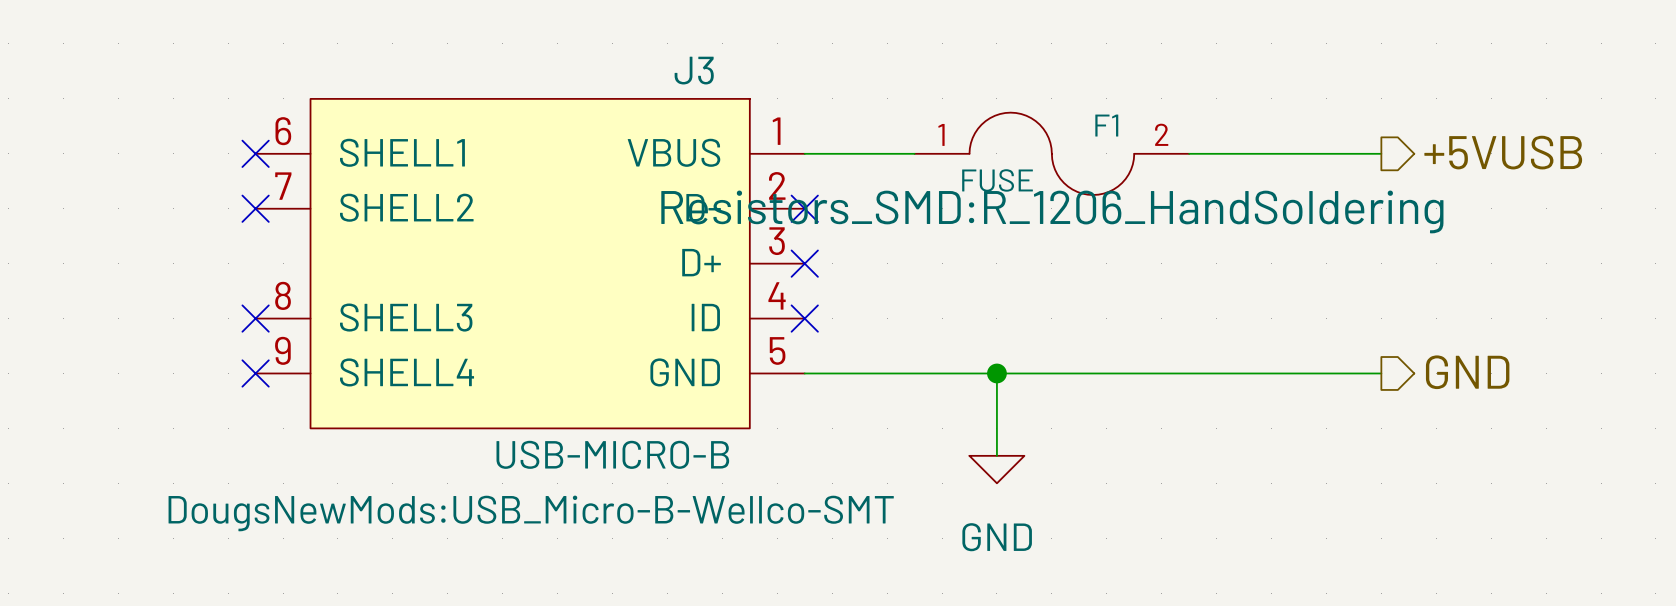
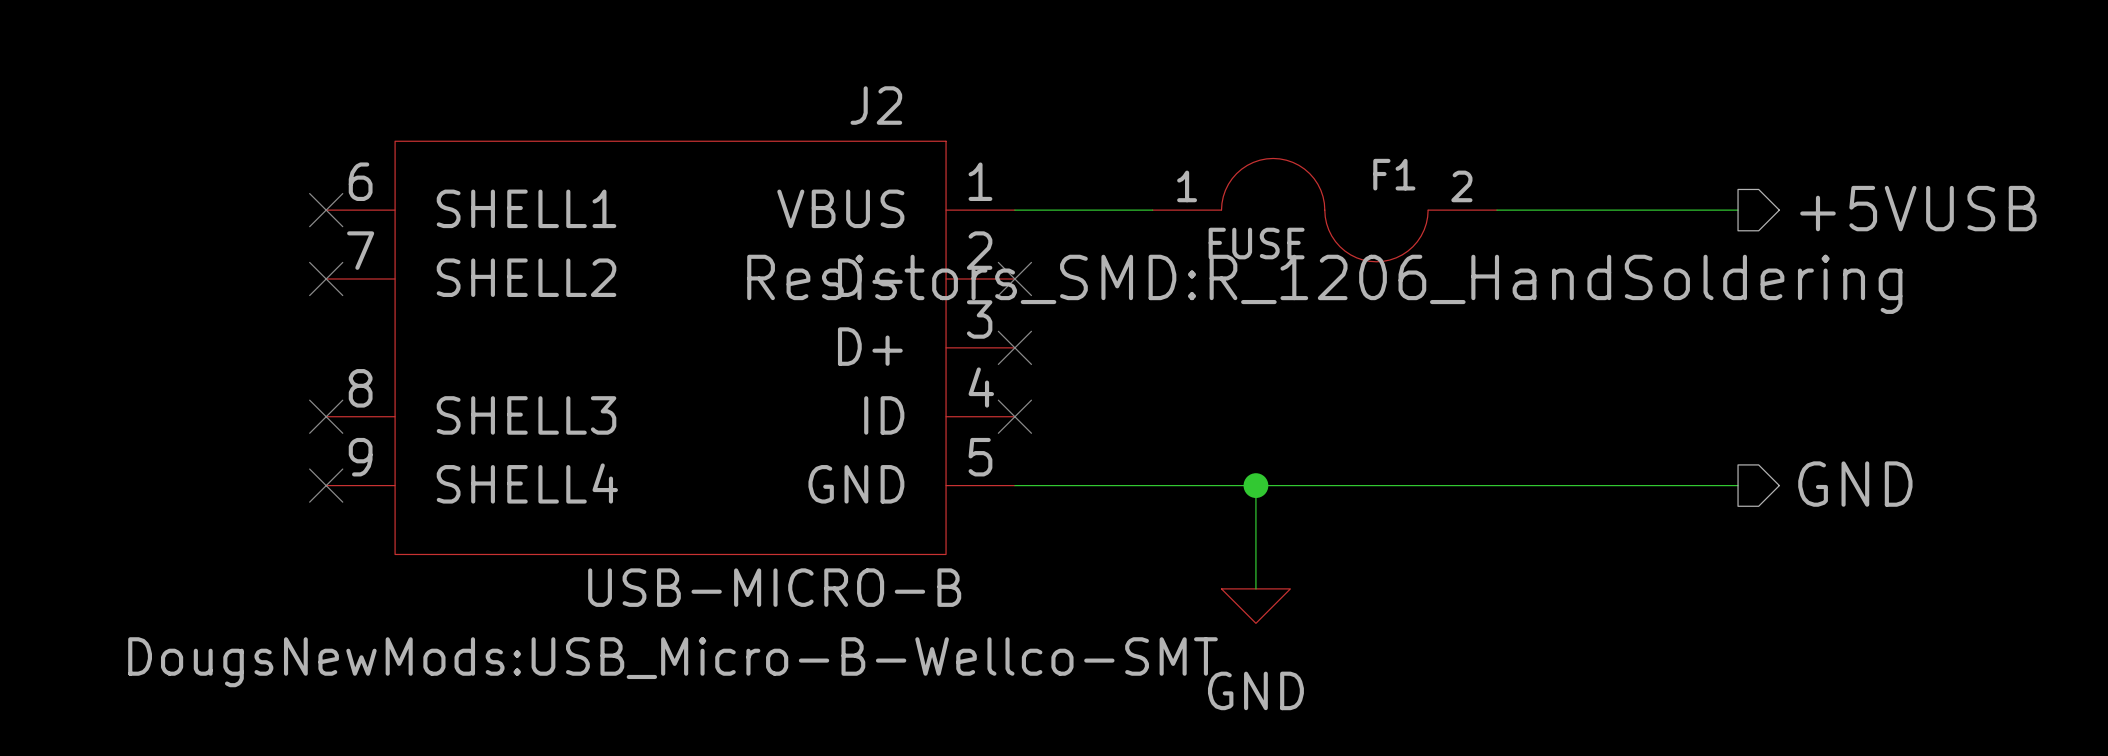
J3 name: J3 (694, 70) -> J2 (876, 105)

